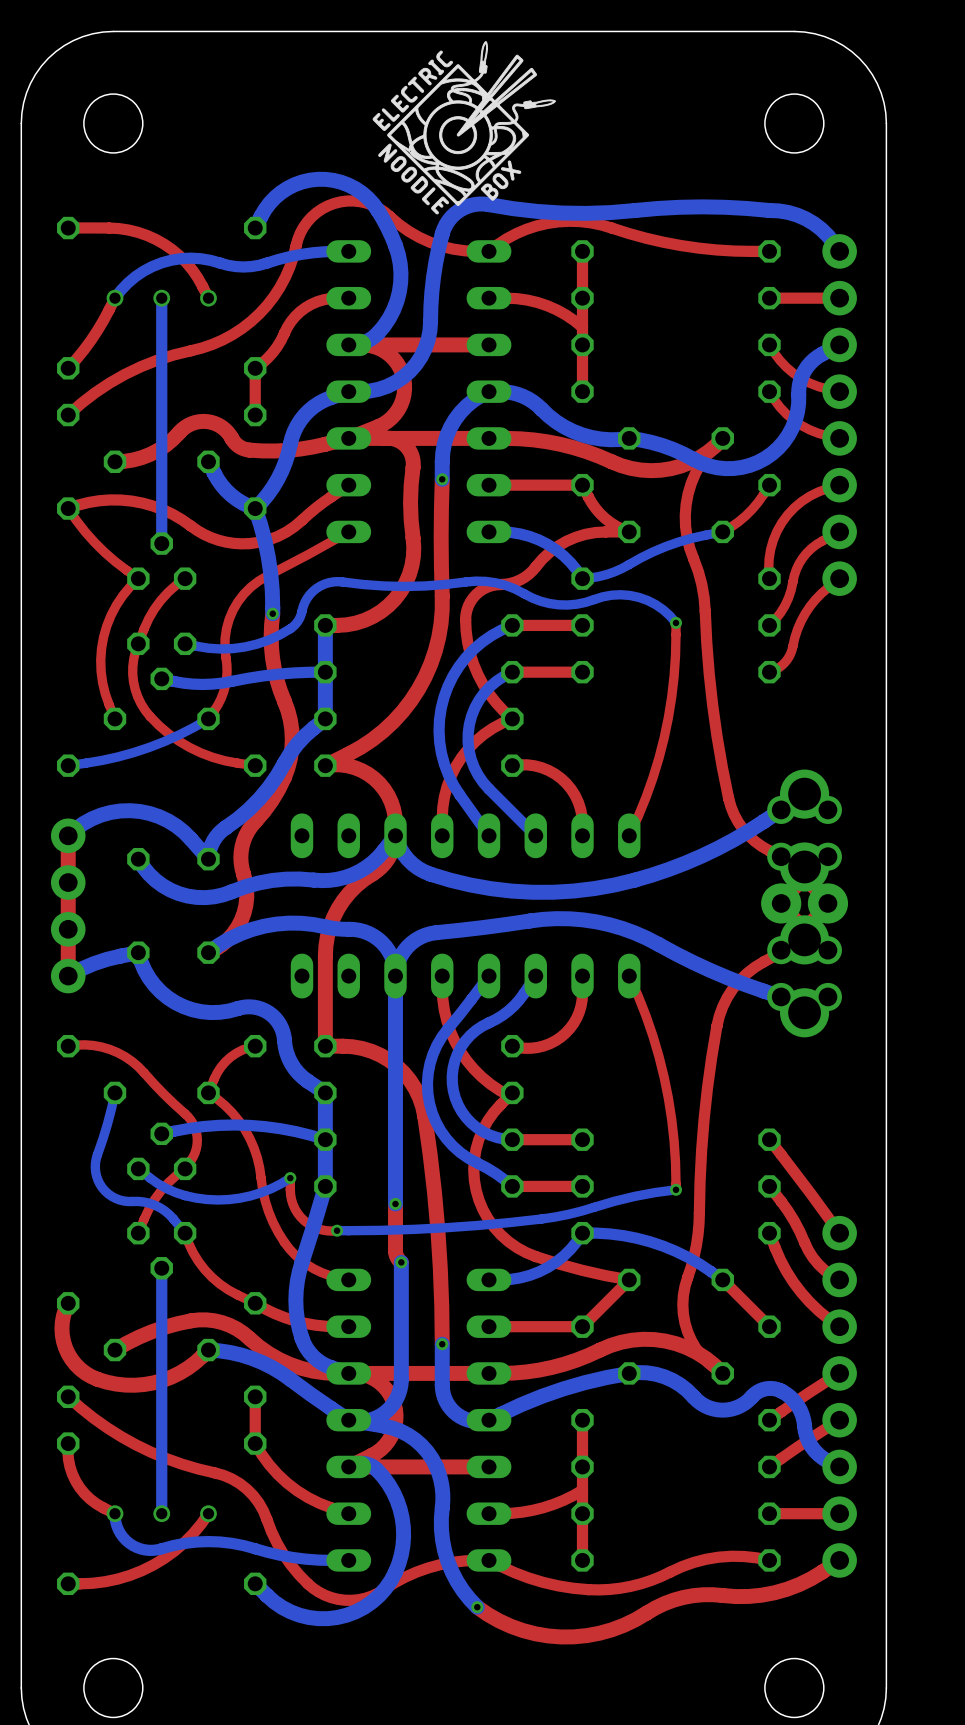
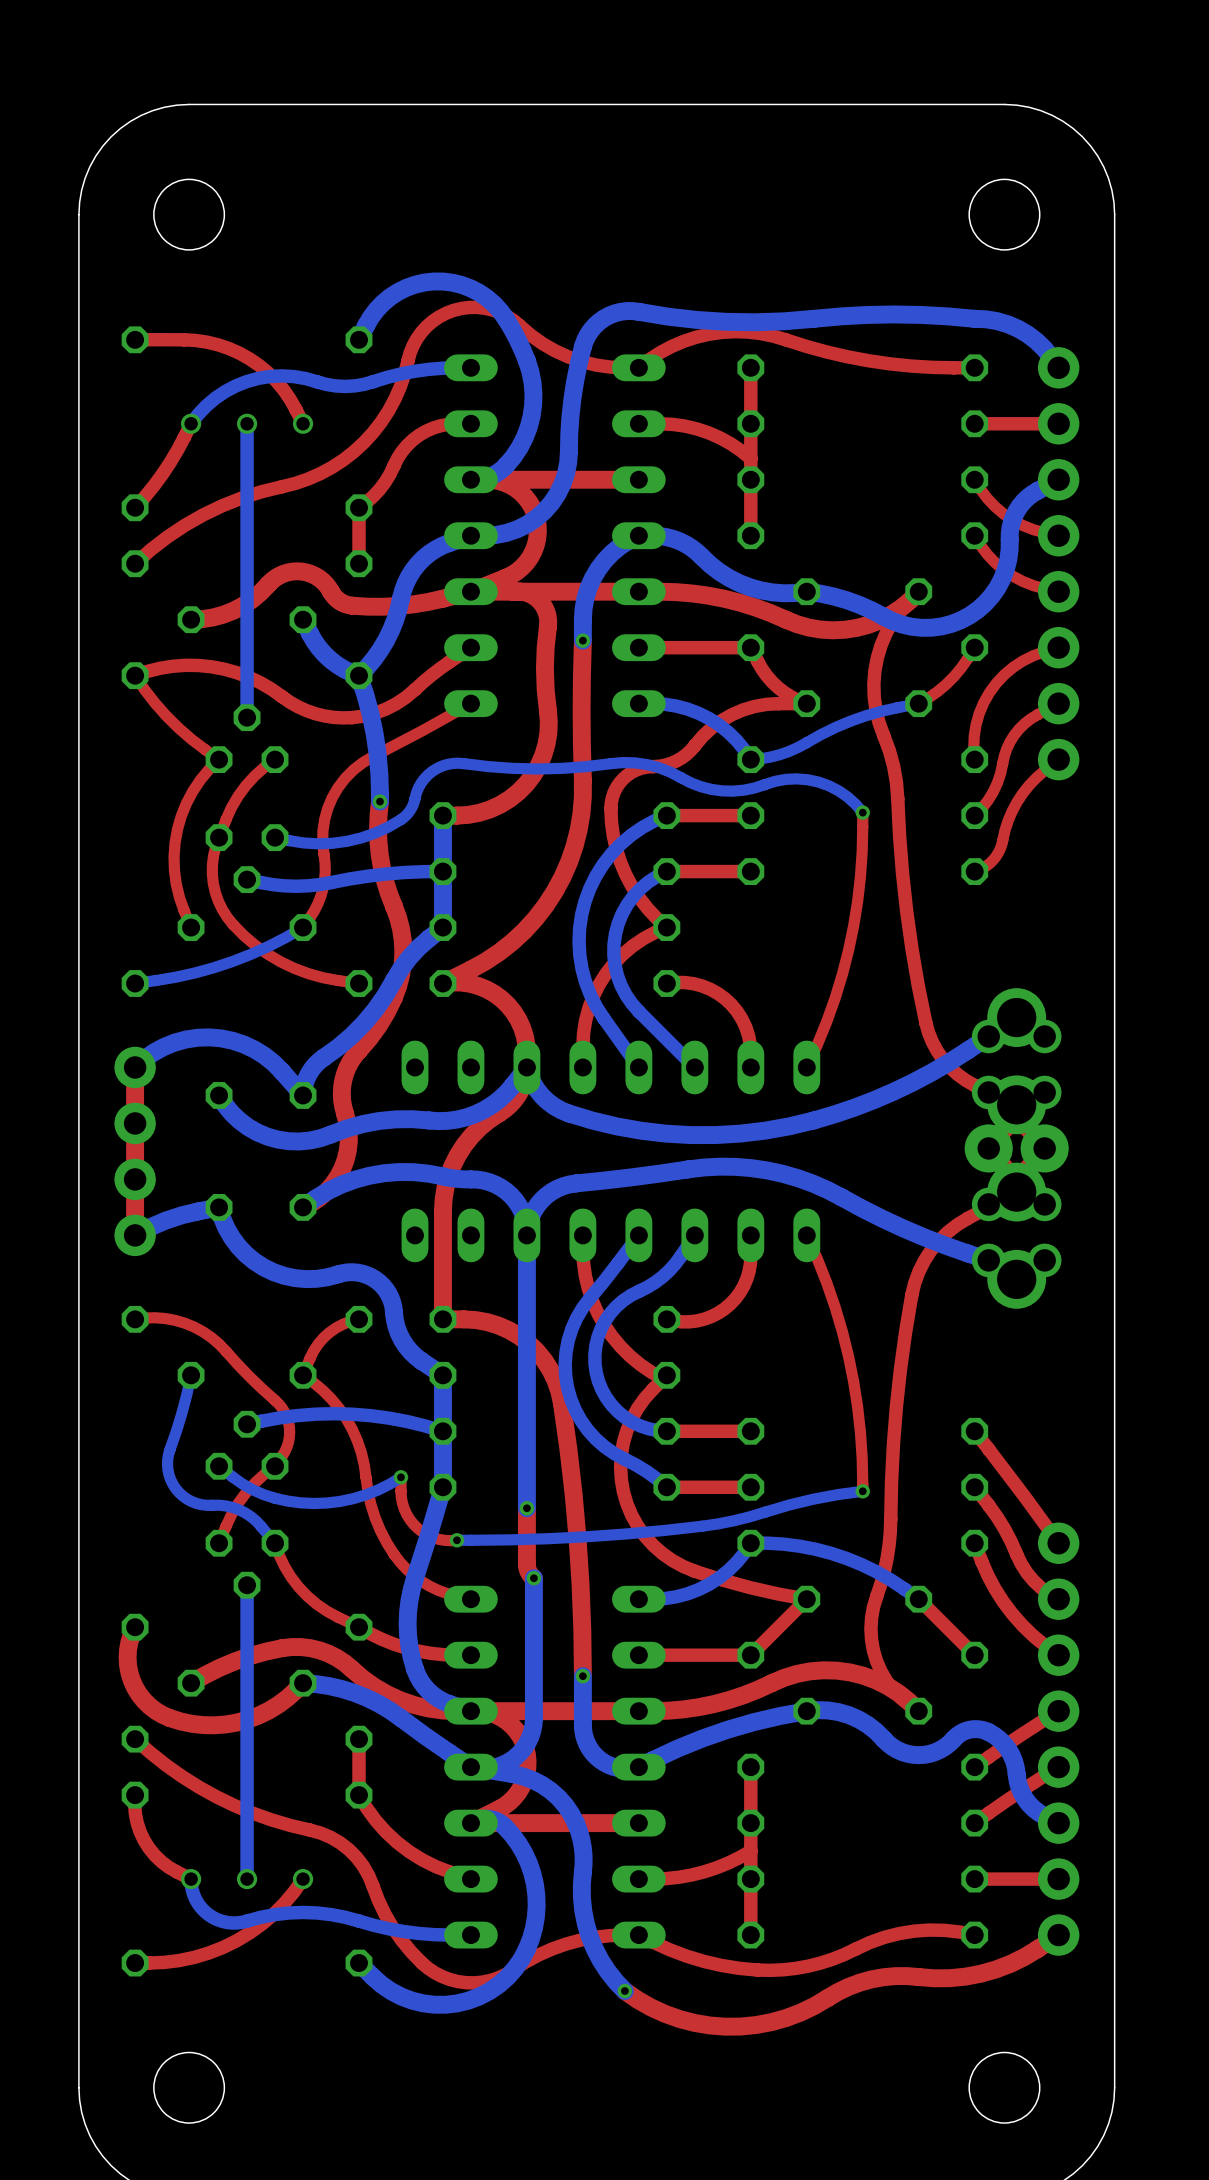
drawing: [372, 41, 556, 215] -> none

